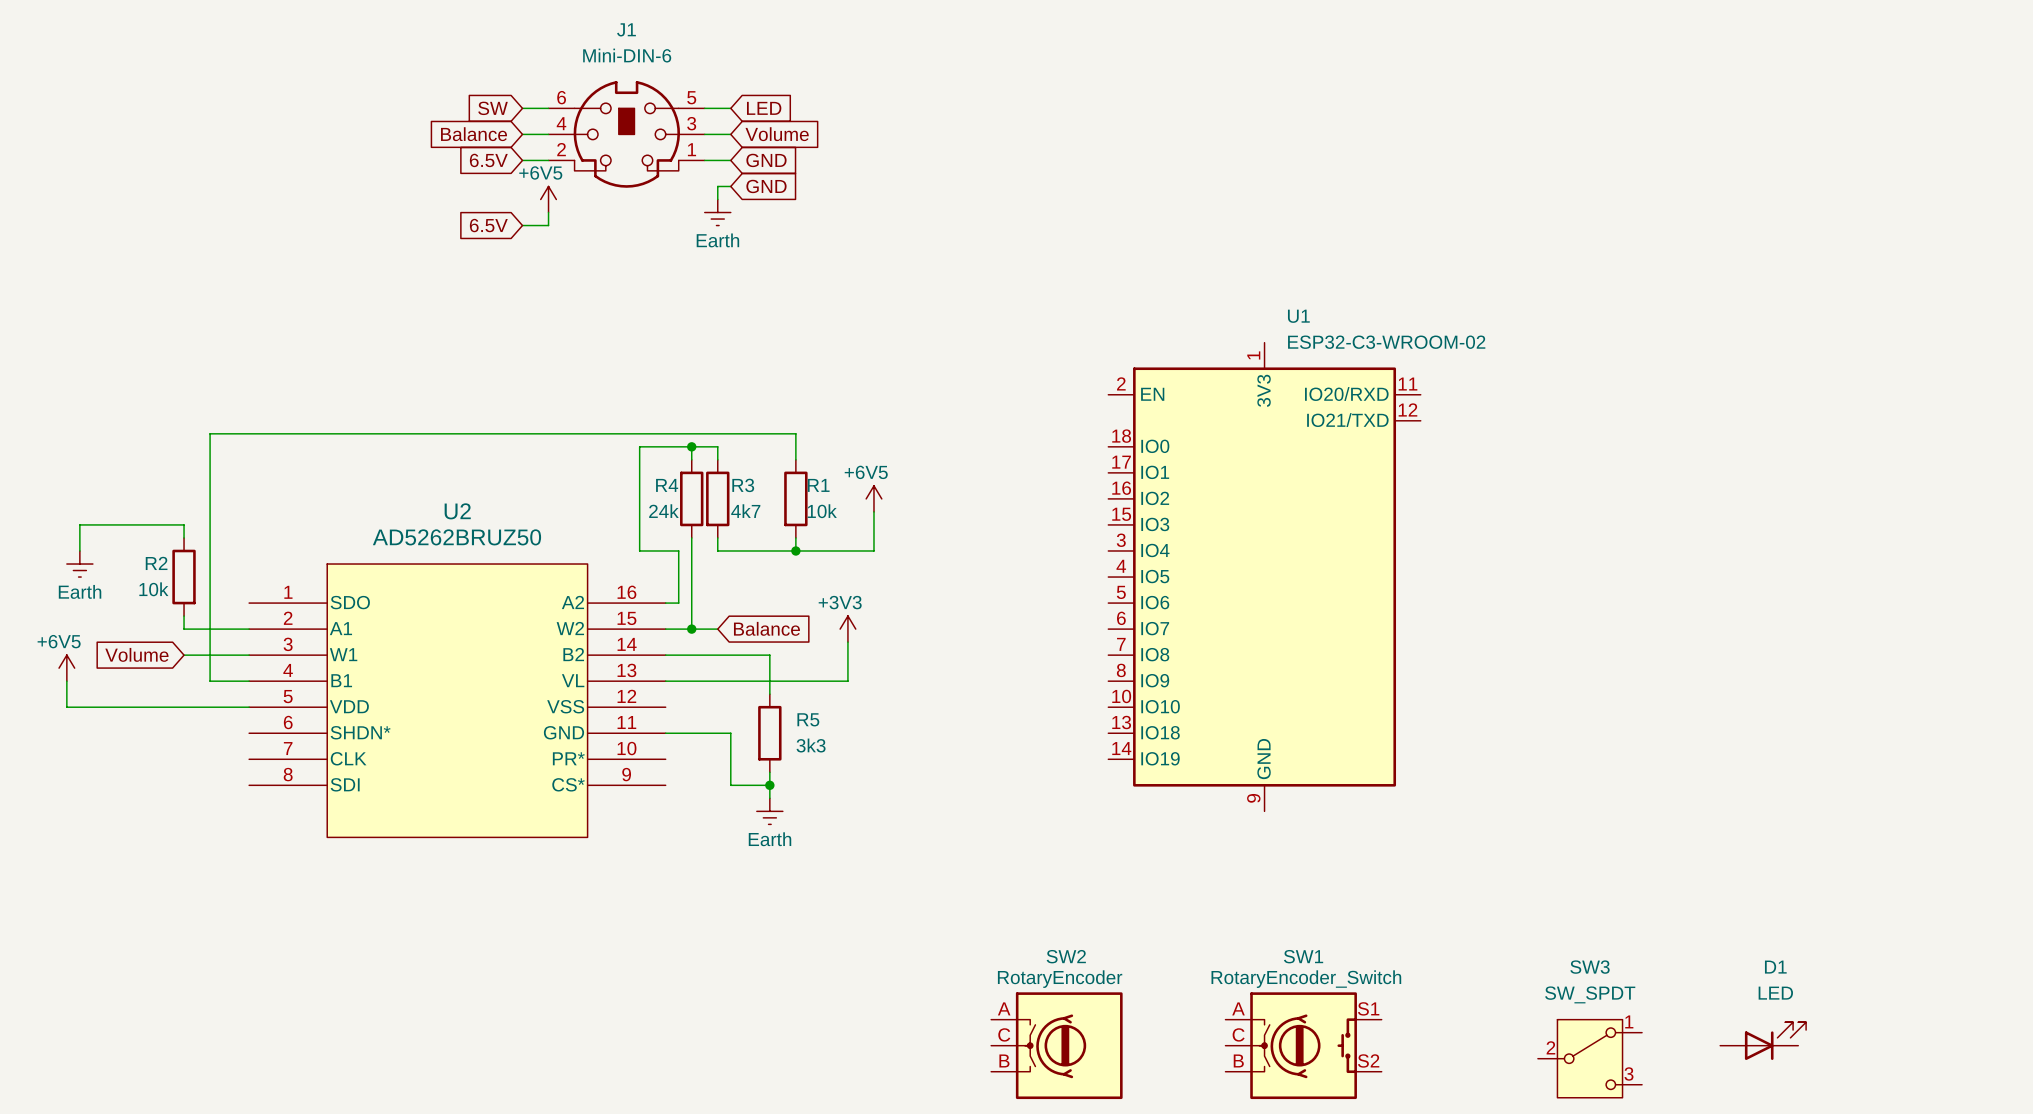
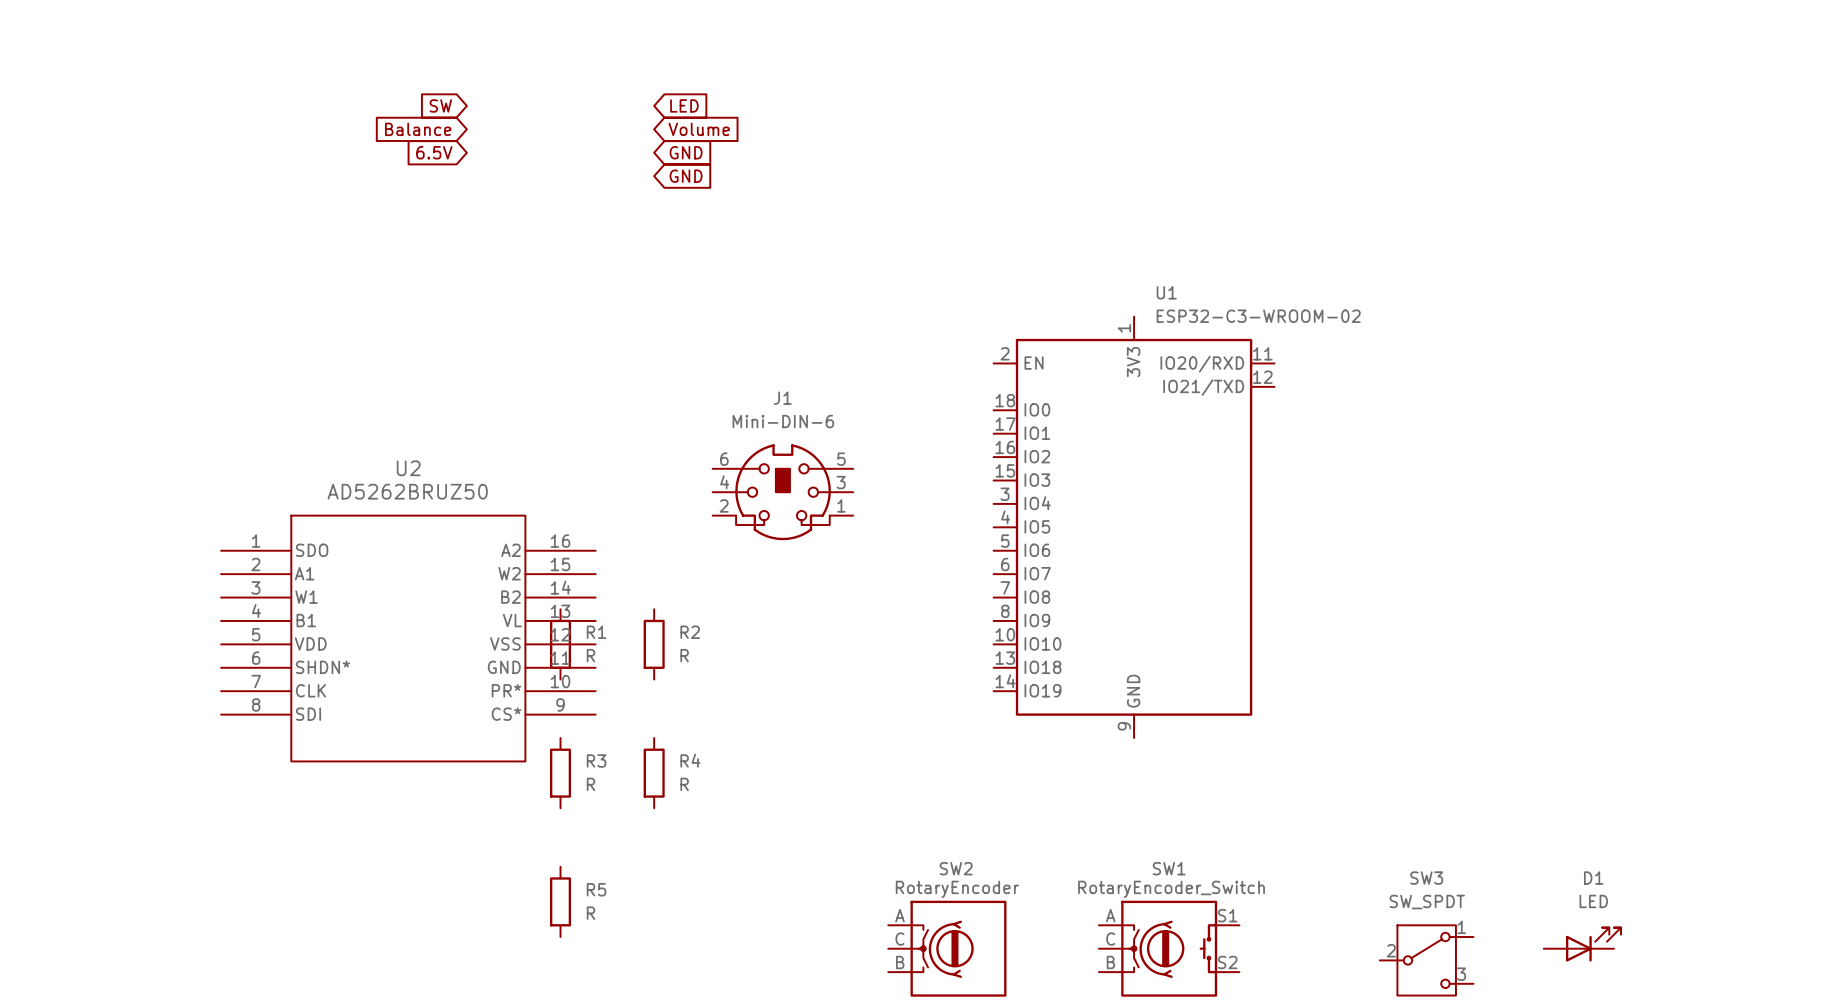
wire: (522, 108) (548, 108) -> none
wire: (704, 108) (730, 108) -> none
wire: (522, 134) (548, 134) -> none
J1 position: (626, 134) -> (782, 492)
wire: (704, 134) (730, 134) -> none
wire: (522, 160) (548, 160) -> none
wire: (704, 160) (730, 160) -> none
wire: (730, 186) (717, 186) (717, 199) -> none
power symbol: +6V5 (548, 199) -> none
wire: (548, 212) (548, 225) (522, 225) -> none
power symbol: Earth (717, 212) -> none
global label: 6.5V (488, 225) -> none
wire: (691, 446) (691, 459) -> none
junction: (691, 446) -> none
wire: (717, 459) (717, 446) (639, 446) (639, 550) (678, 550) (678, 603) (665, 603) -> none
wire: (795, 459) (795, 433) (210, 433) (210, 681) (249, 681) -> none
R4 name position: R4 (667, 485) -> R4 (690, 760)
R3 name position: R3 (743, 485) -> R3 (596, 760)
R1 name position: R1 (818, 485) -> R1 (596, 632)
R4 position: (691, 498) -> (654, 773)
R3 position: (717, 498) -> (560, 773)
R1 position: (795, 498) -> (560, 644)
power symbol: +6V5 (873, 498) -> none
R4 value: 24k (663, 511) -> R (684, 784)
R3 value: 4k7 (745, 511) -> R (590, 784)
R1 value: 10k (822, 511) -> R (590, 655)
wire: (873, 511) (873, 550) (717, 550) (717, 537) -> none
wire: (184, 537) (184, 524) (79, 524) (79, 550) -> none
wire: (691, 537) (691, 629) -> none
wire: (795, 537) (795, 550) -> none
junction: (795, 550) -> none
R2 name position: R2 (156, 563) -> R2 (690, 632)
power symbol: Earth (79, 564) -> none
R2 position: (184, 577) -> (654, 644)
R2 value: 10k (153, 589) -> R (684, 655)
wire: (184, 616) (184, 629) (249, 629) -> none
global label: Balance (766, 628) -> none
wire: (665, 629) (717, 629) -> none
junction: (691, 629) -> none
power symbol: +3V3 (847, 629) -> none
wire: (847, 642) (847, 681) (665, 681) -> none
global label: Volume (136, 654) -> none
wire: (184, 655) (249, 655) -> none
wire: (665, 655) (769, 655) (769, 694) -> none
power symbol: +6V5 (66, 668) -> none
wire: (66, 681) (66, 707) (249, 707) -> none
wire: (665, 733) (730, 733) (730, 785) (769, 785) -> none
R5 position: (769, 733) -> (560, 901)
R5 value: 3k3 (811, 745) -> R (590, 913)
wire: (769, 772) (769, 798) -> none
junction: (769, 785) -> none
power symbol: Earth (769, 811) -> none

